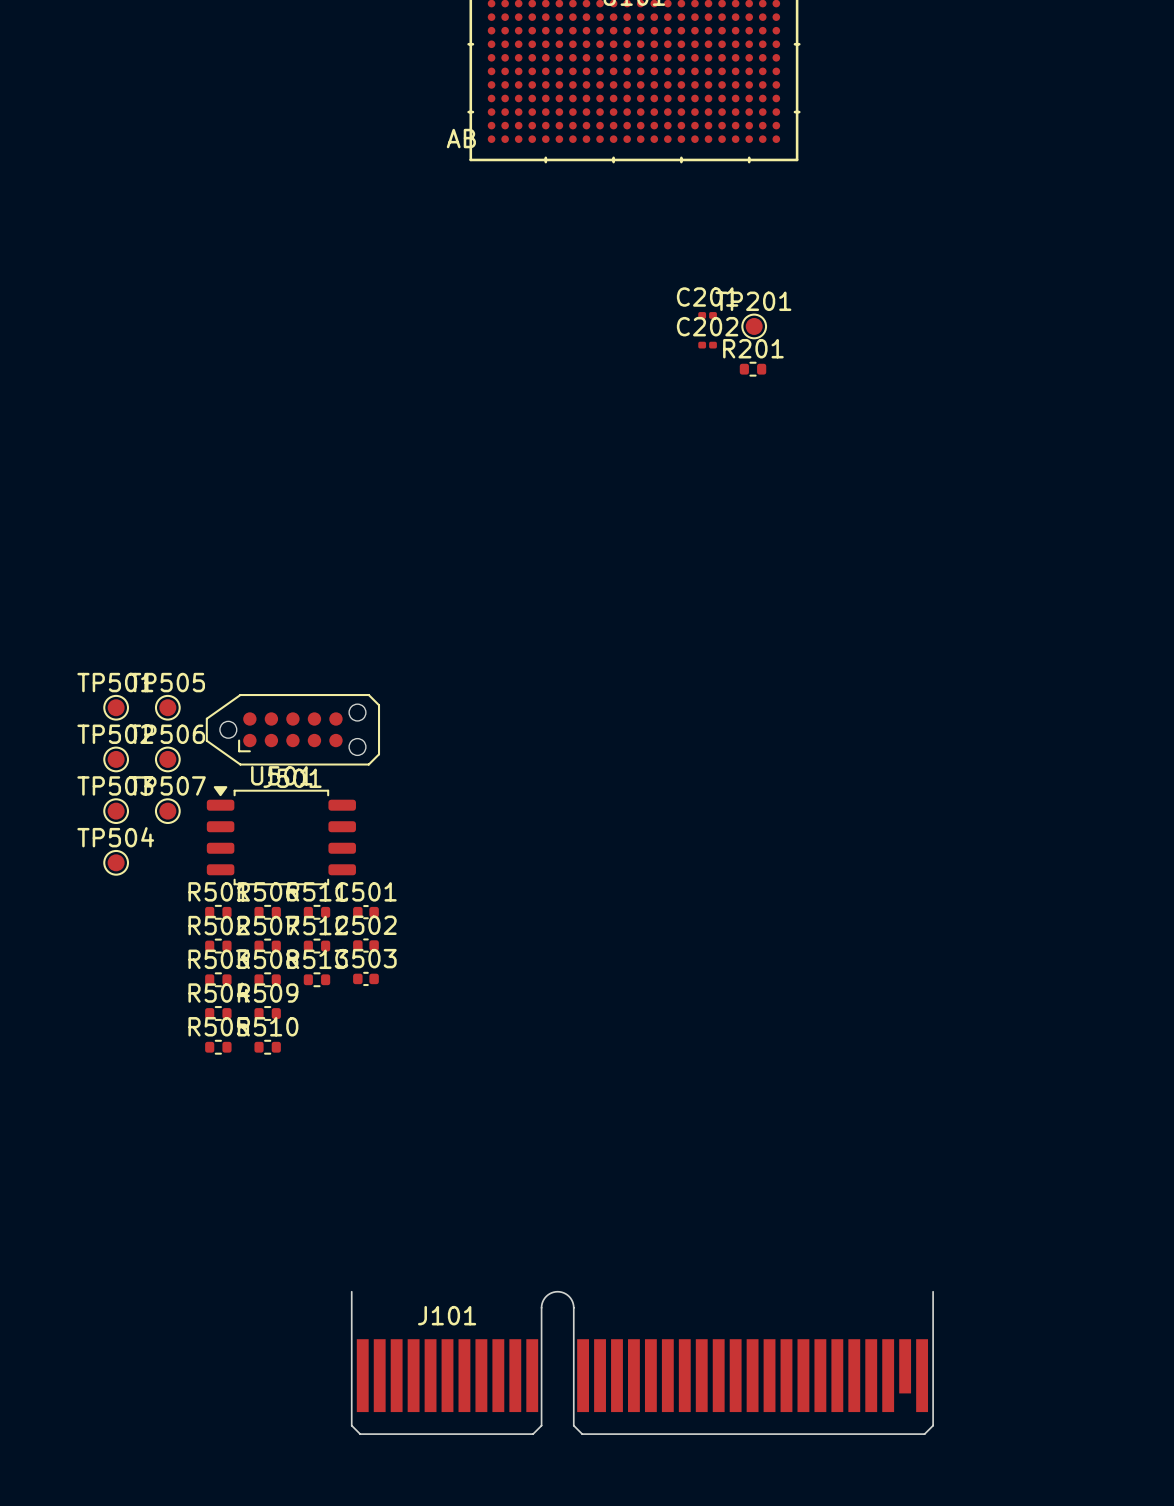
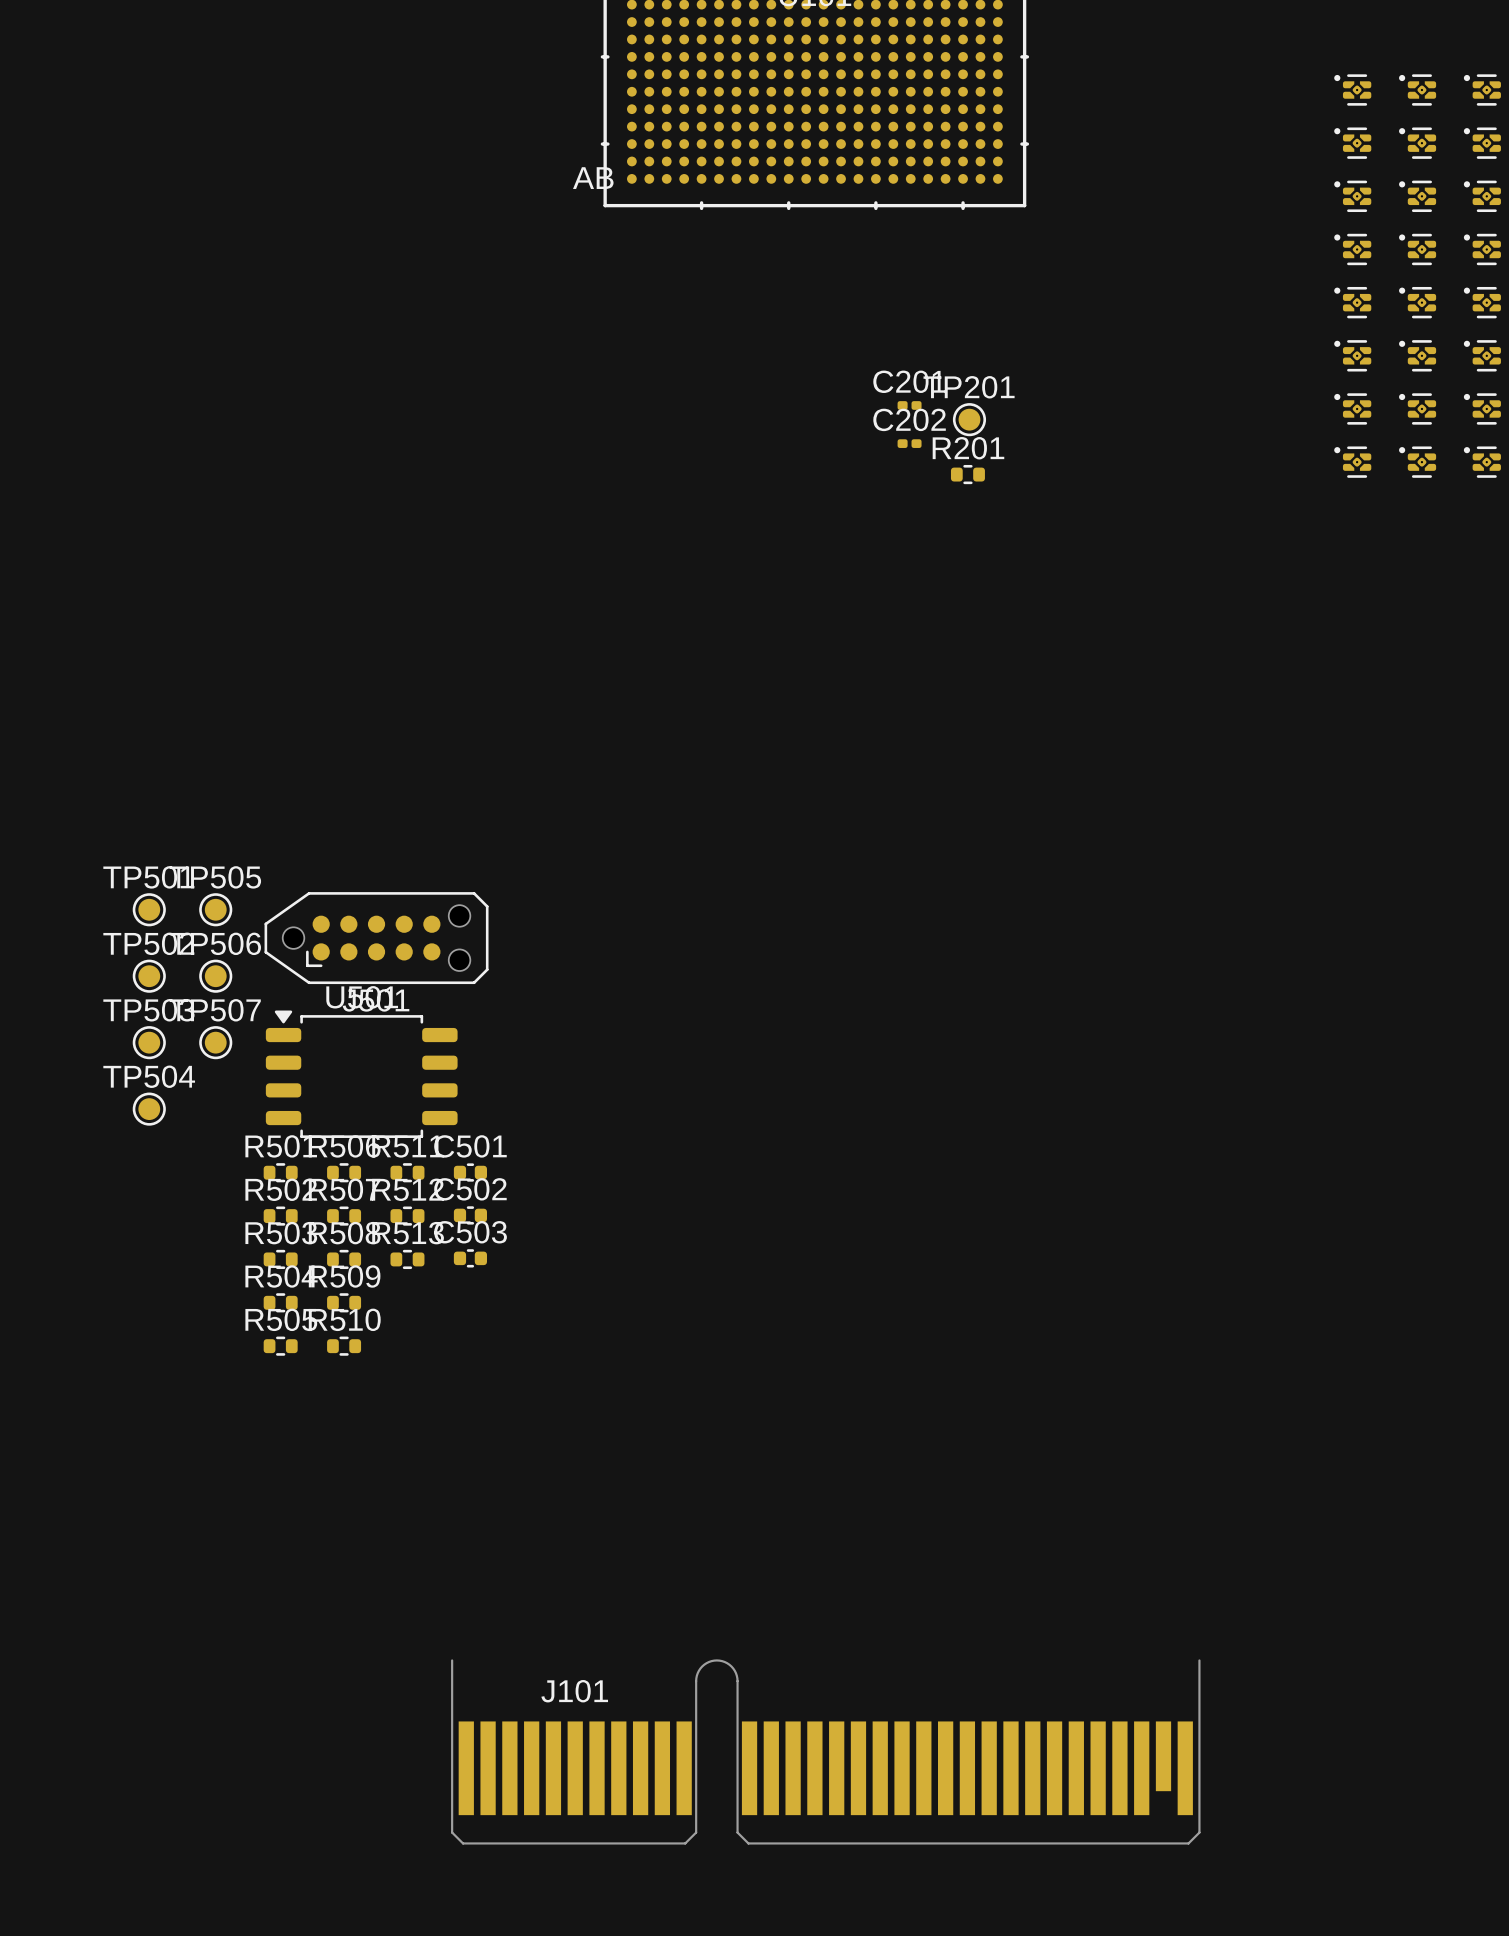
part: none -> (1352, 90)
part: none -> (1417, 90)
part: none -> (1482, 90)
part: none -> (1352, 143)
part: none -> (1417, 143)
part: none -> (1482, 143)
part: none -> (1352, 196)
part: none -> (1417, 196)
part: none -> (1482, 196)
part: none -> (1352, 249)
part: none -> (1417, 249)
part: none -> (1482, 249)
part: none -> (1352, 302)
part: none -> (1417, 302)
part: none -> (1482, 302)
part: none -> (1352, 355)
part: none -> (1417, 355)
part: none -> (1482, 355)
part: none -> (1352, 408)
part: none -> (1417, 408)
part: none -> (1482, 408)
part: none -> (1352, 462)
part: none -> (1417, 462)
part: none -> (1482, 462)

